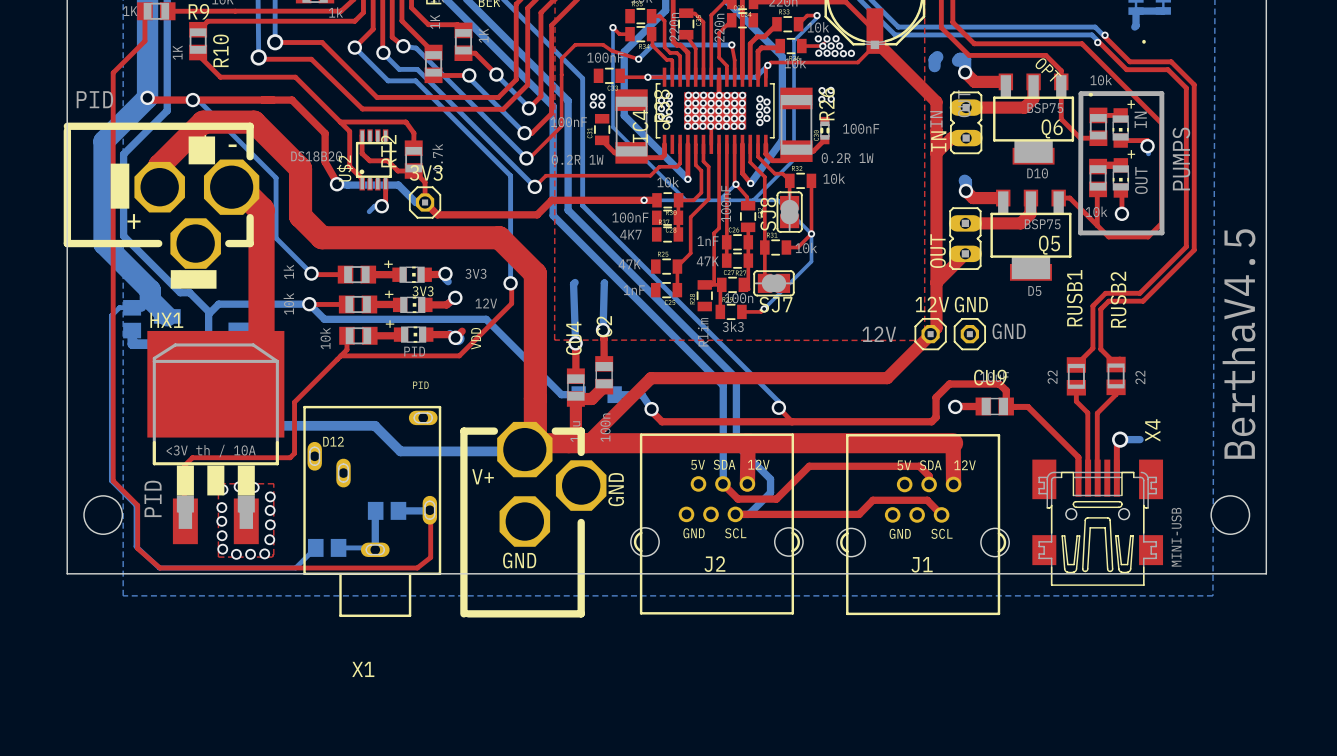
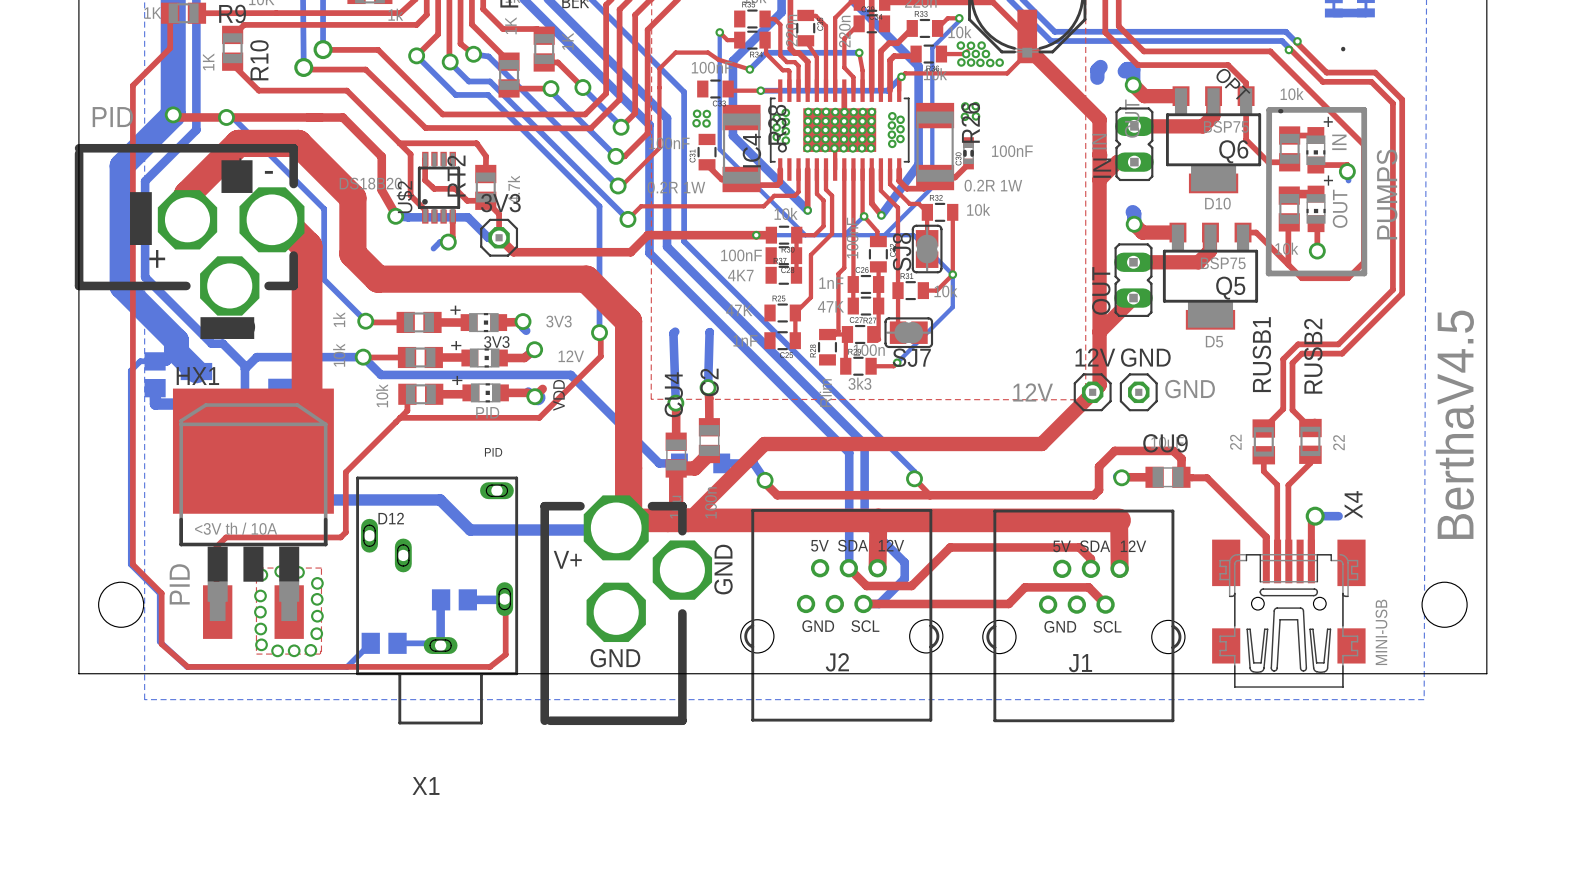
bottom track: (1136, 11) (1134, 27) -> none

